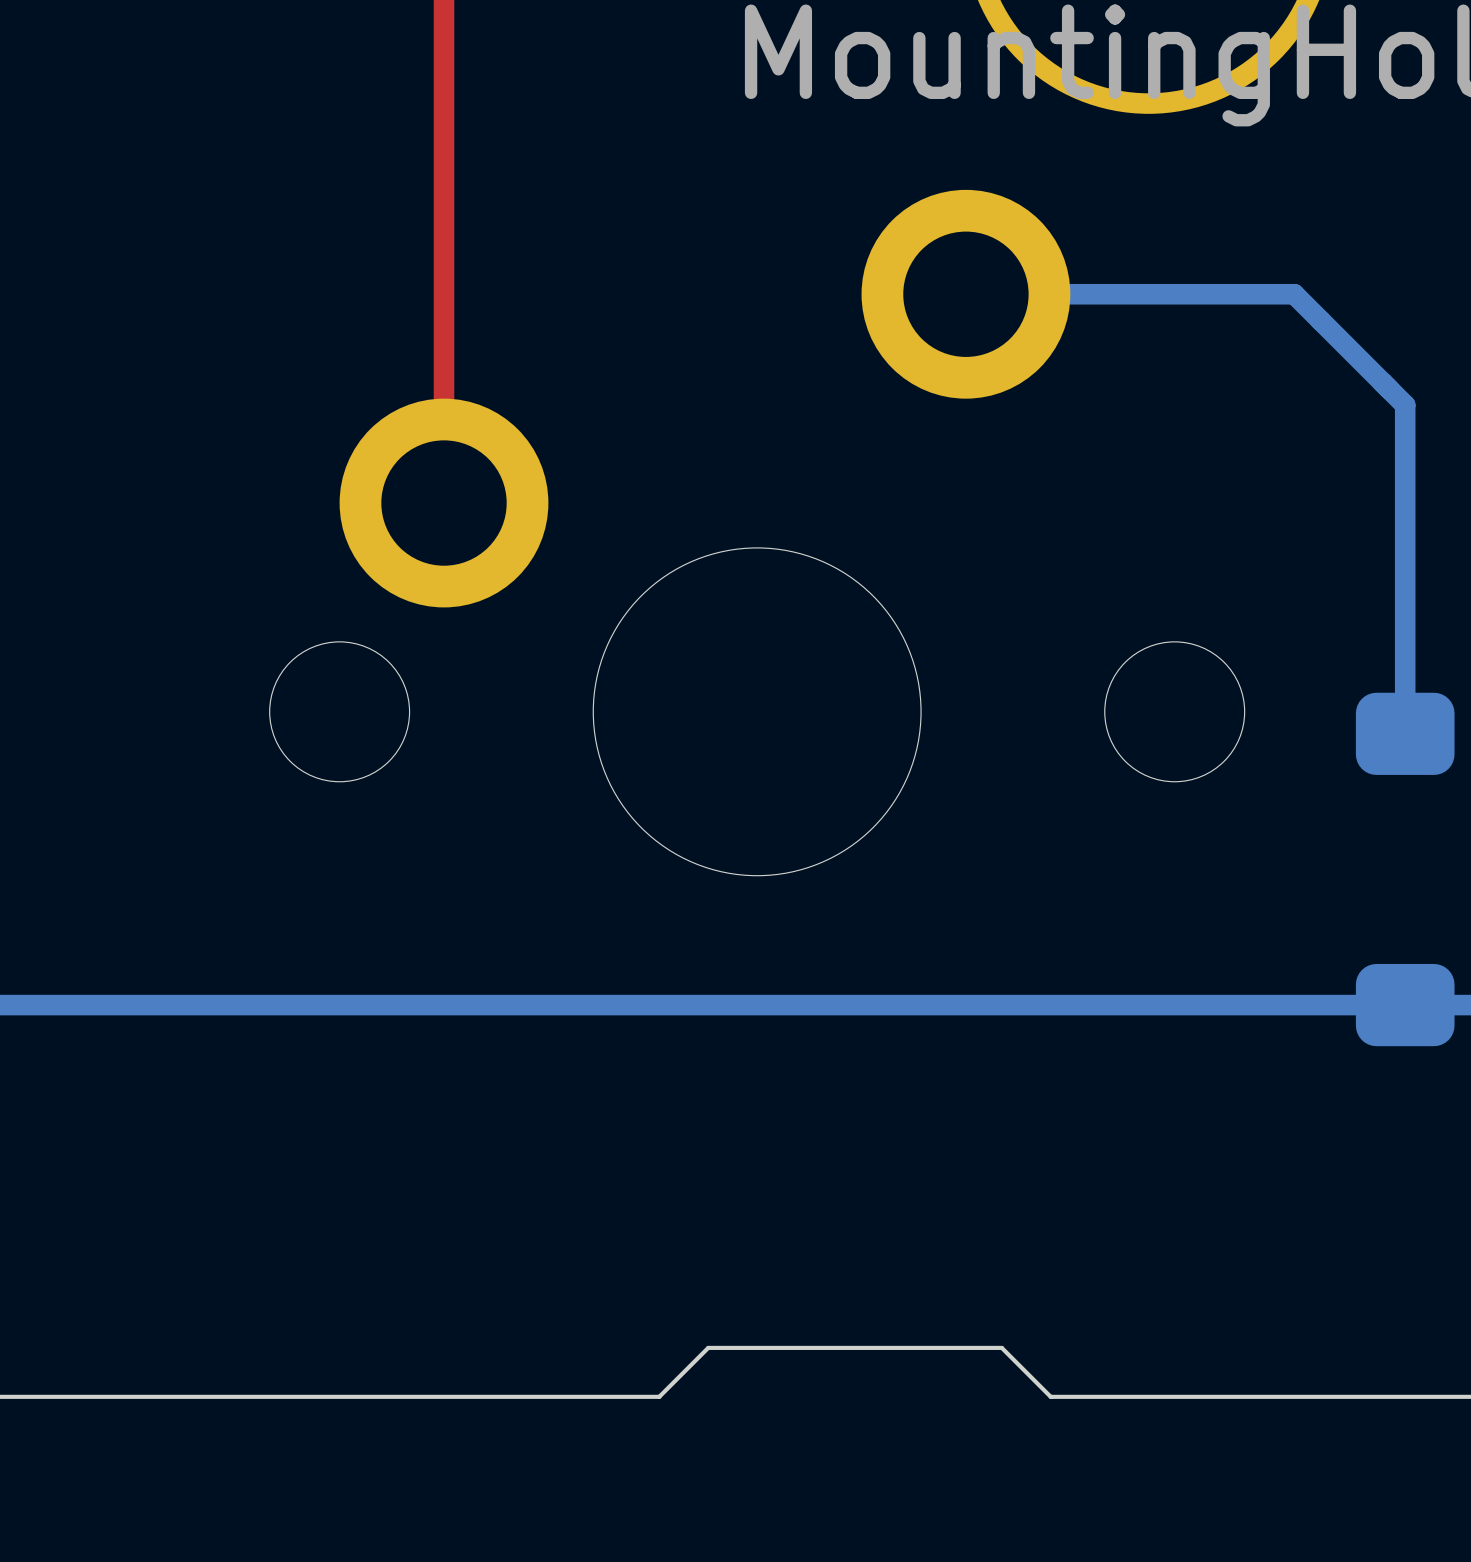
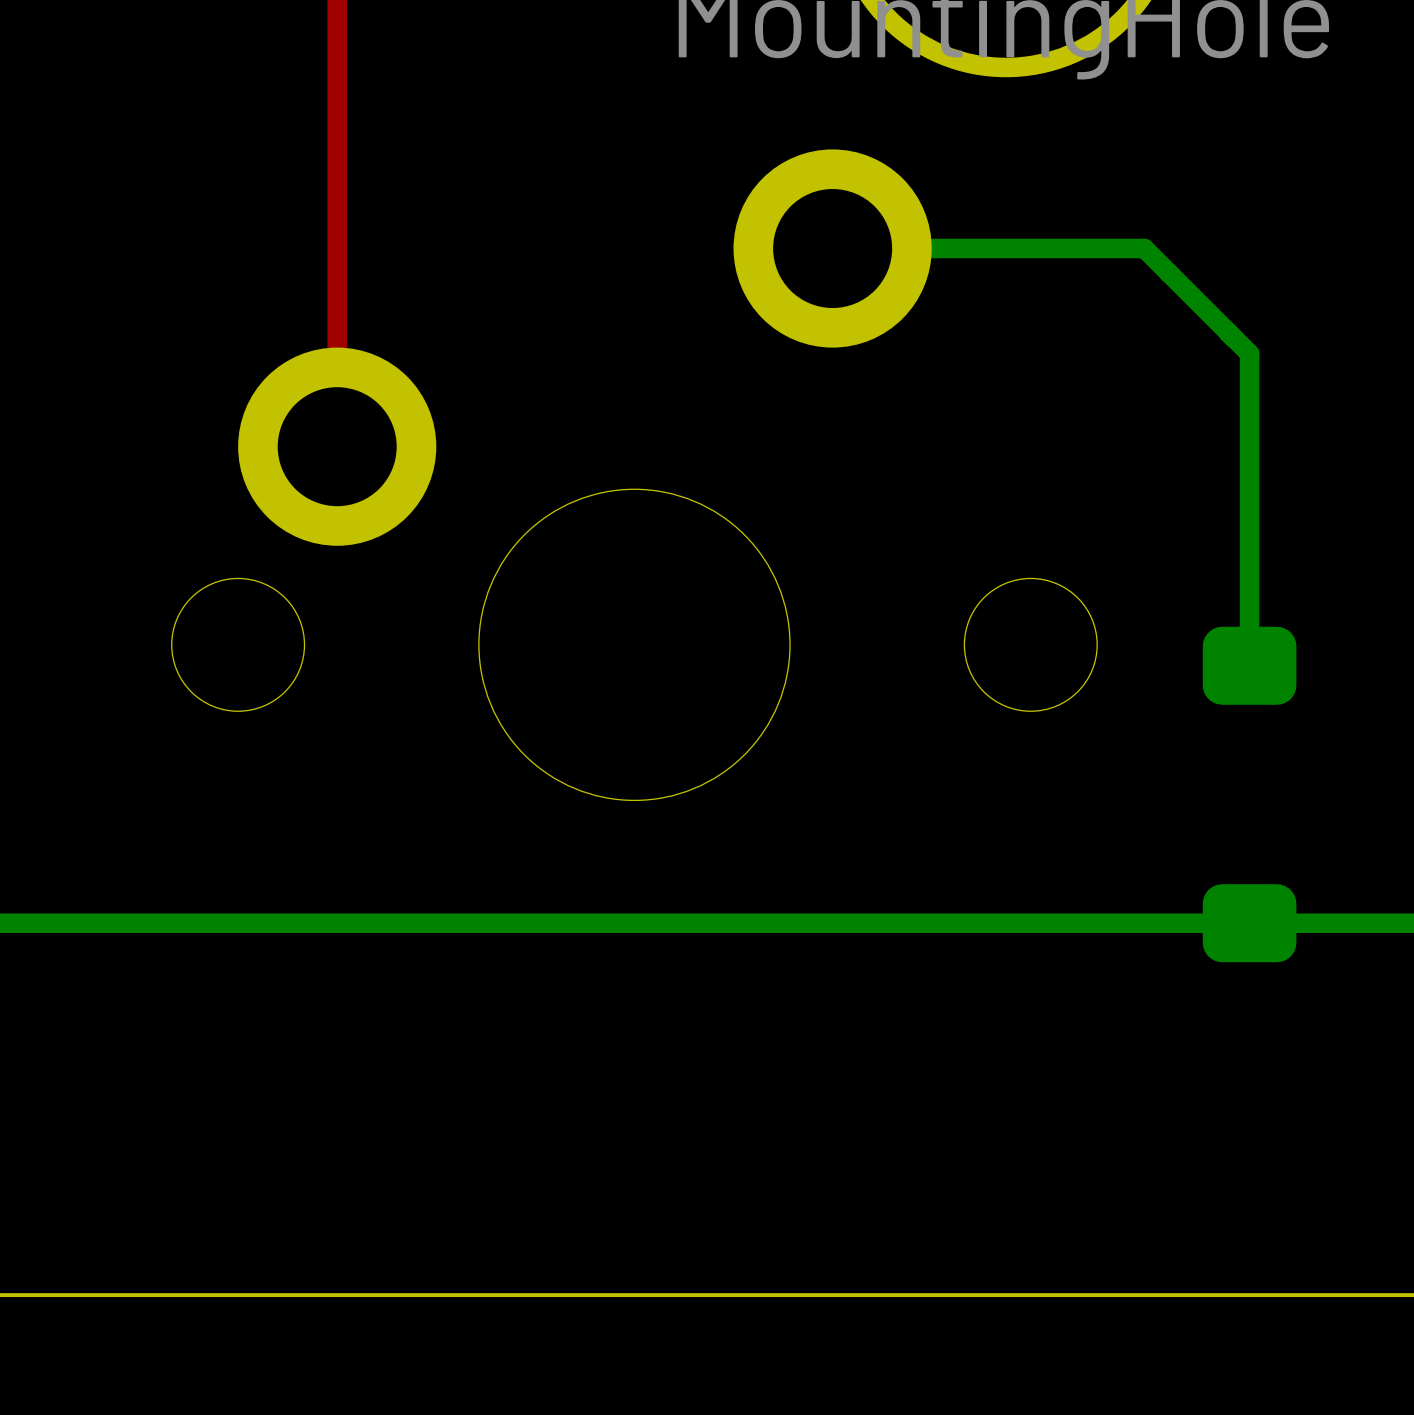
board edge: (659, 1396) (708, 1347) (1001, 1347) (1050, 1396) -> (541, 1295) (913, 1295)

